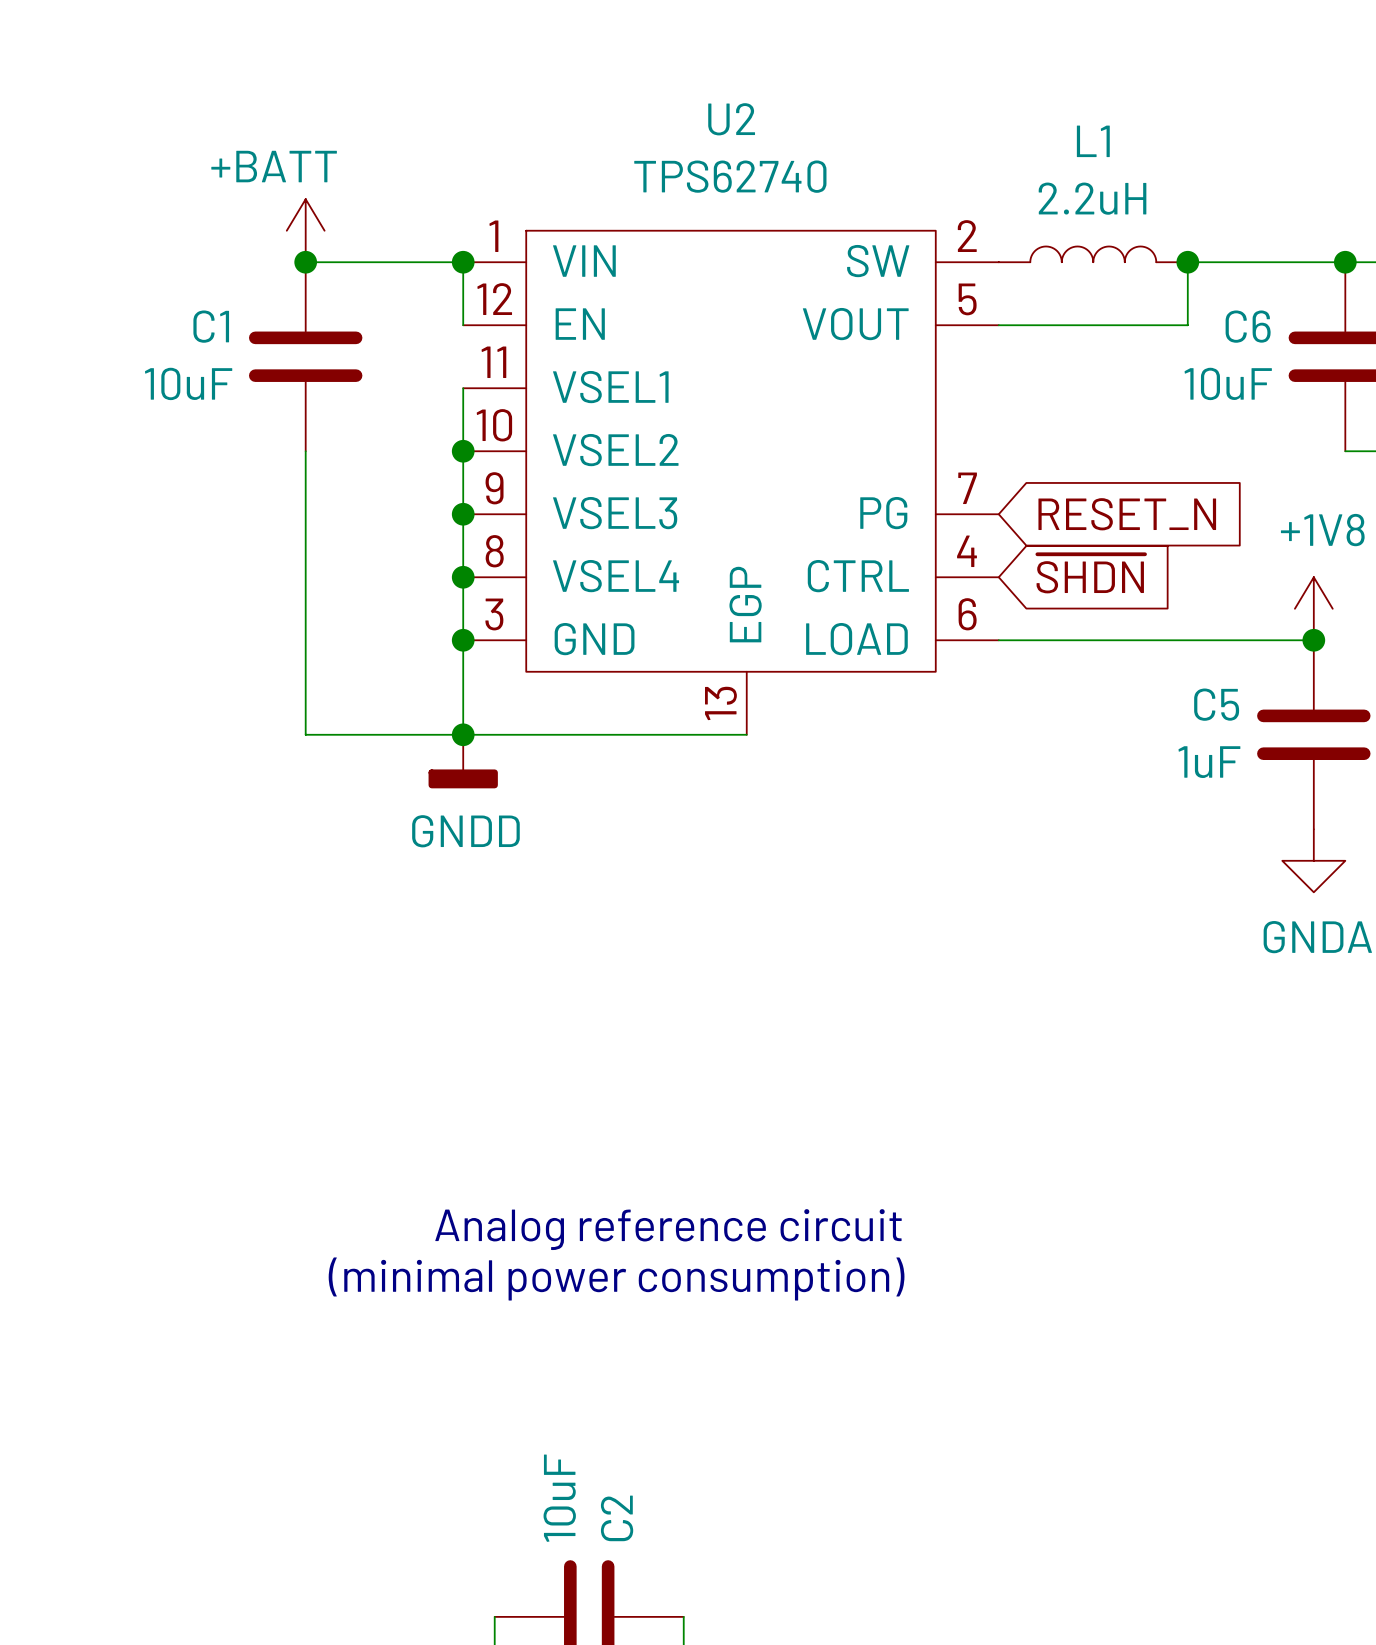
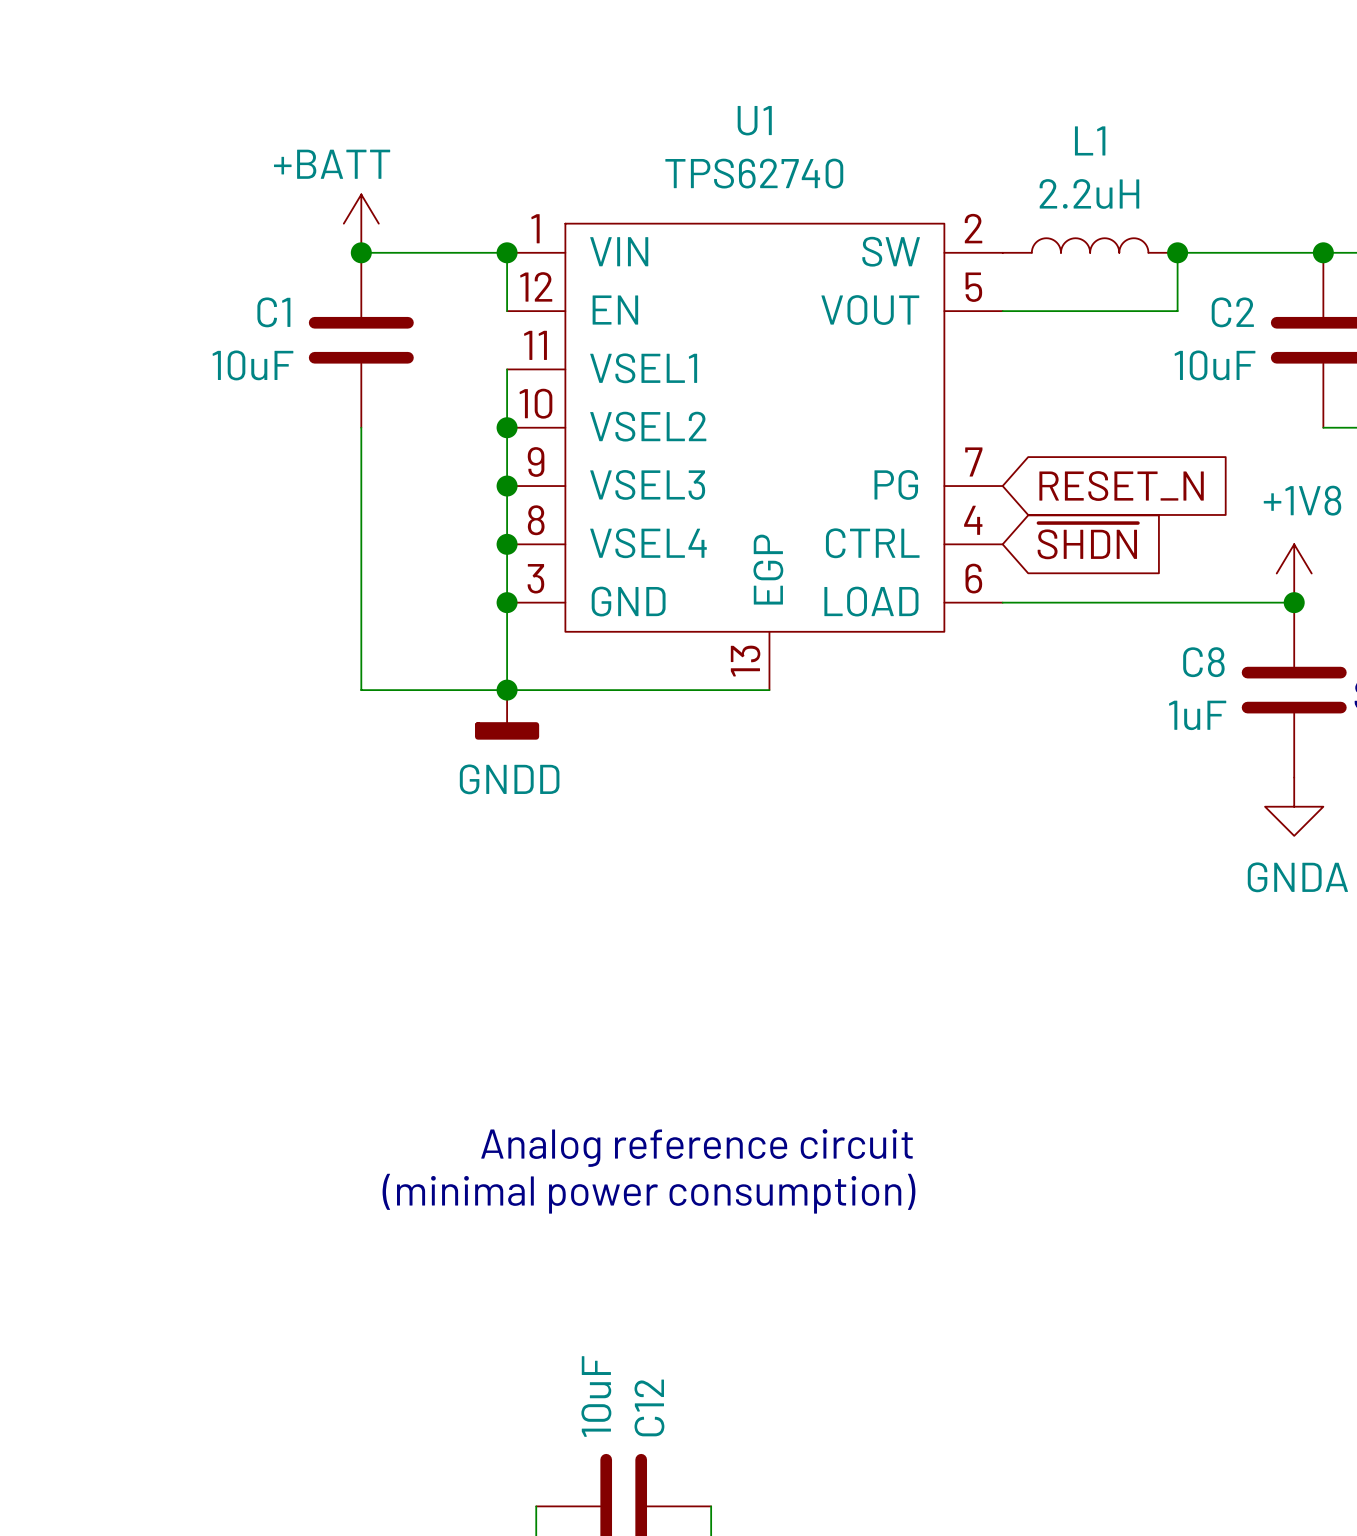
U2 name: U2 (731, 119) -> U1 (754, 120)
C6 name: C6 (1248, 326) -> C2 (1232, 312)
C5 name: C5 (1216, 704) -> C8 (1203, 662)
C2 name: C2 (617, 1518) -> C12 (649, 1407)

